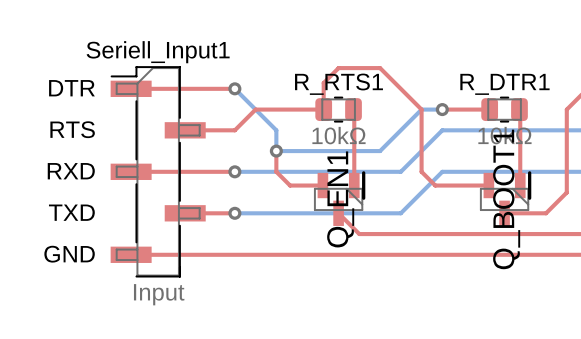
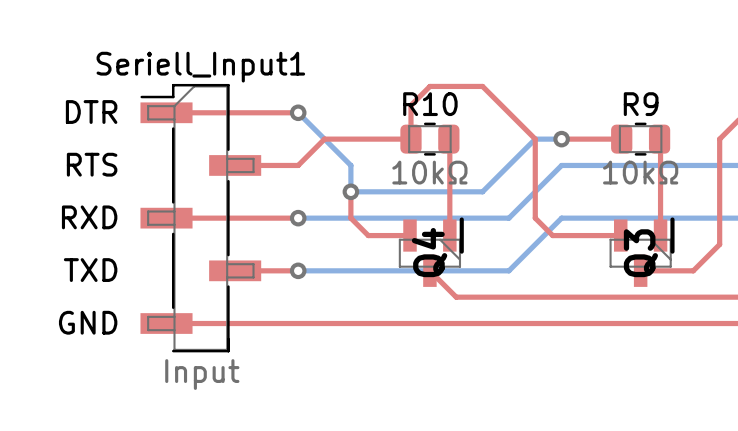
R_RTS1 name: R_RTS1 (338, 84) -> R10 (430, 104)
R_DTR1 name: R_DTR1 (504, 84) -> R9 (641, 104)
Q_EN1 name: Q_EN1 (340, 199) -> Q4 (429, 252)
Q_BOOT1 name: Q_BOOT1 (506, 199) -> Q3 (640, 253)

